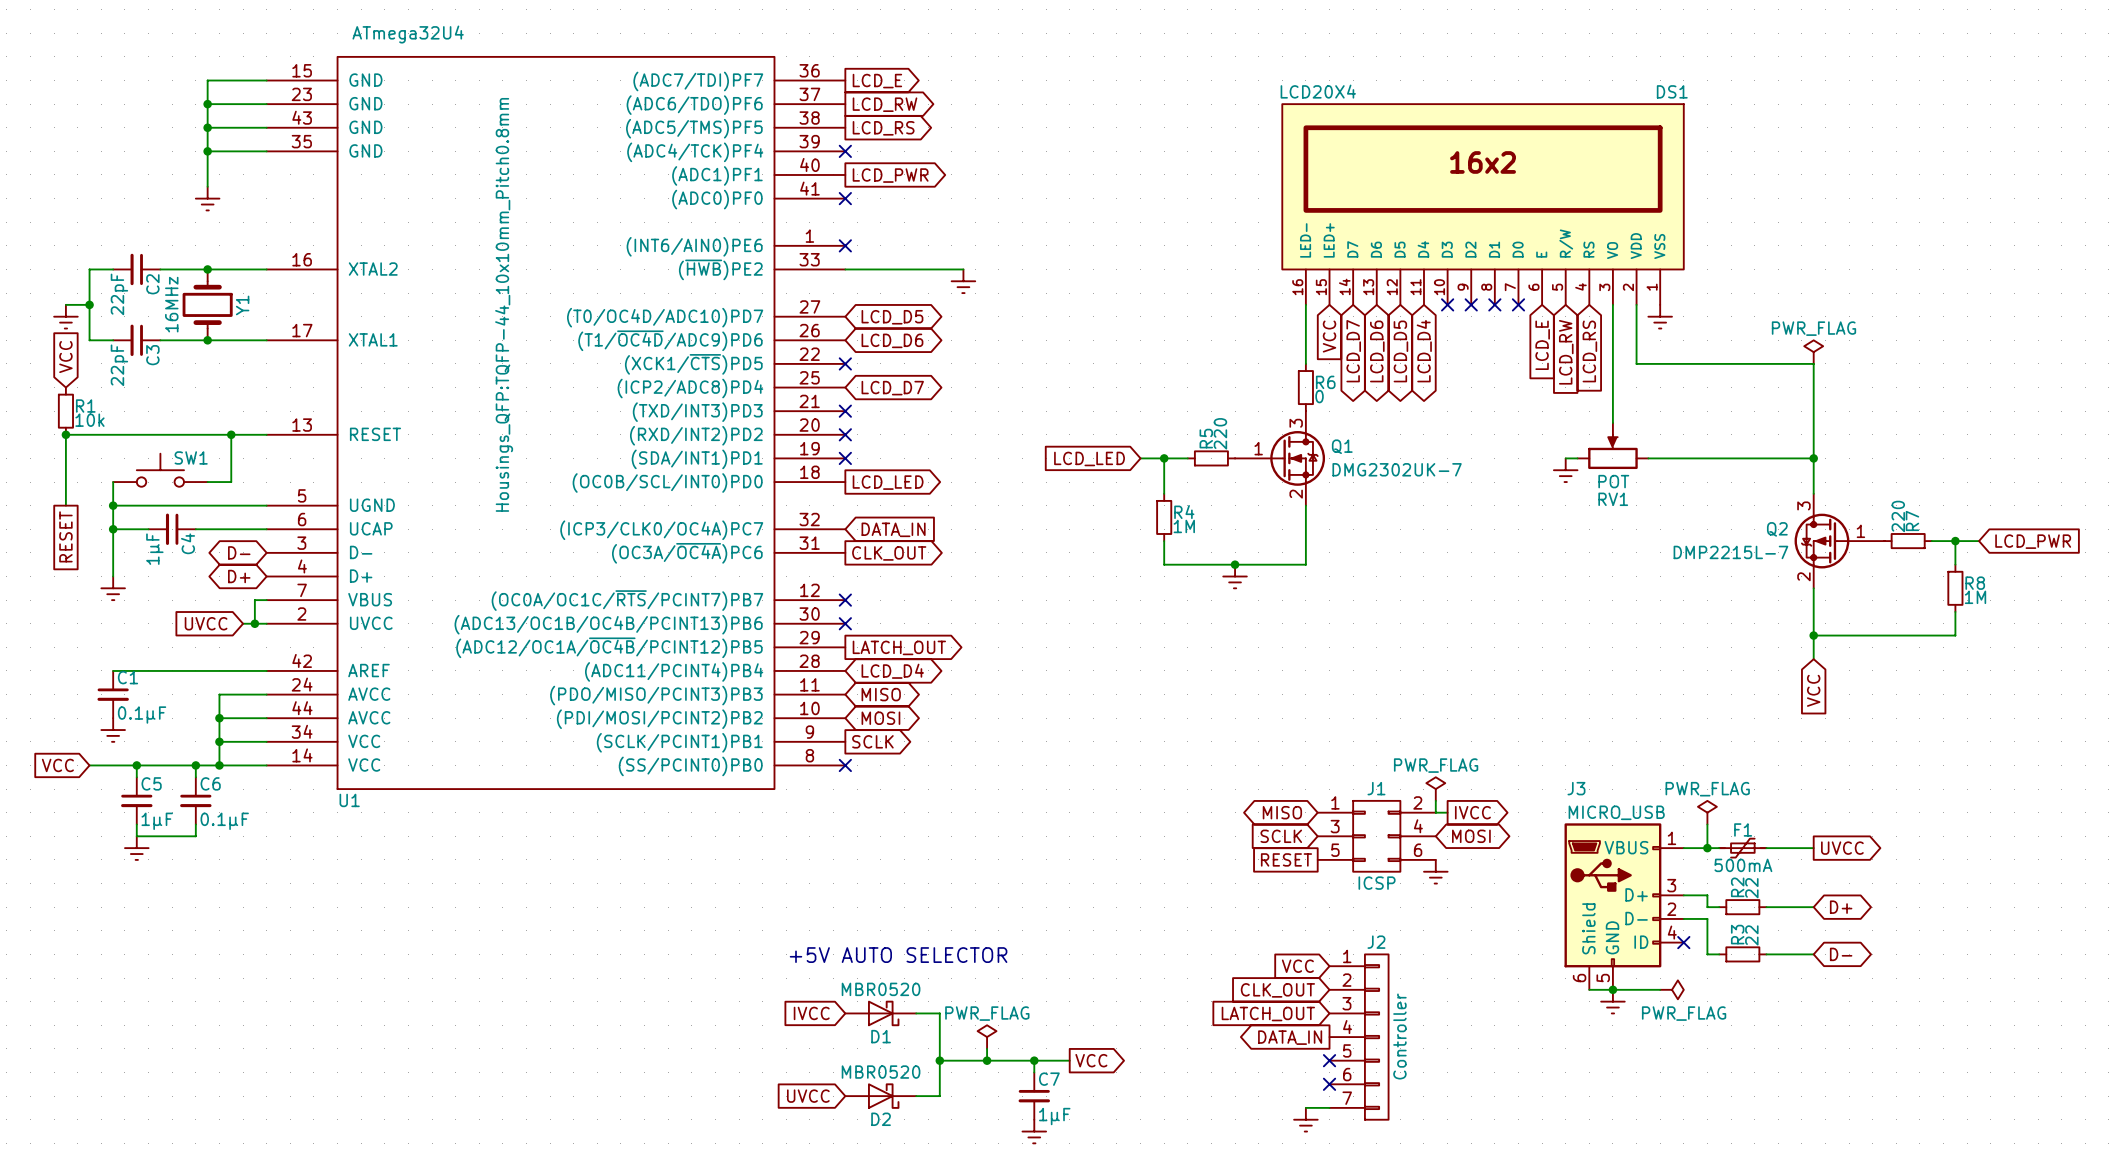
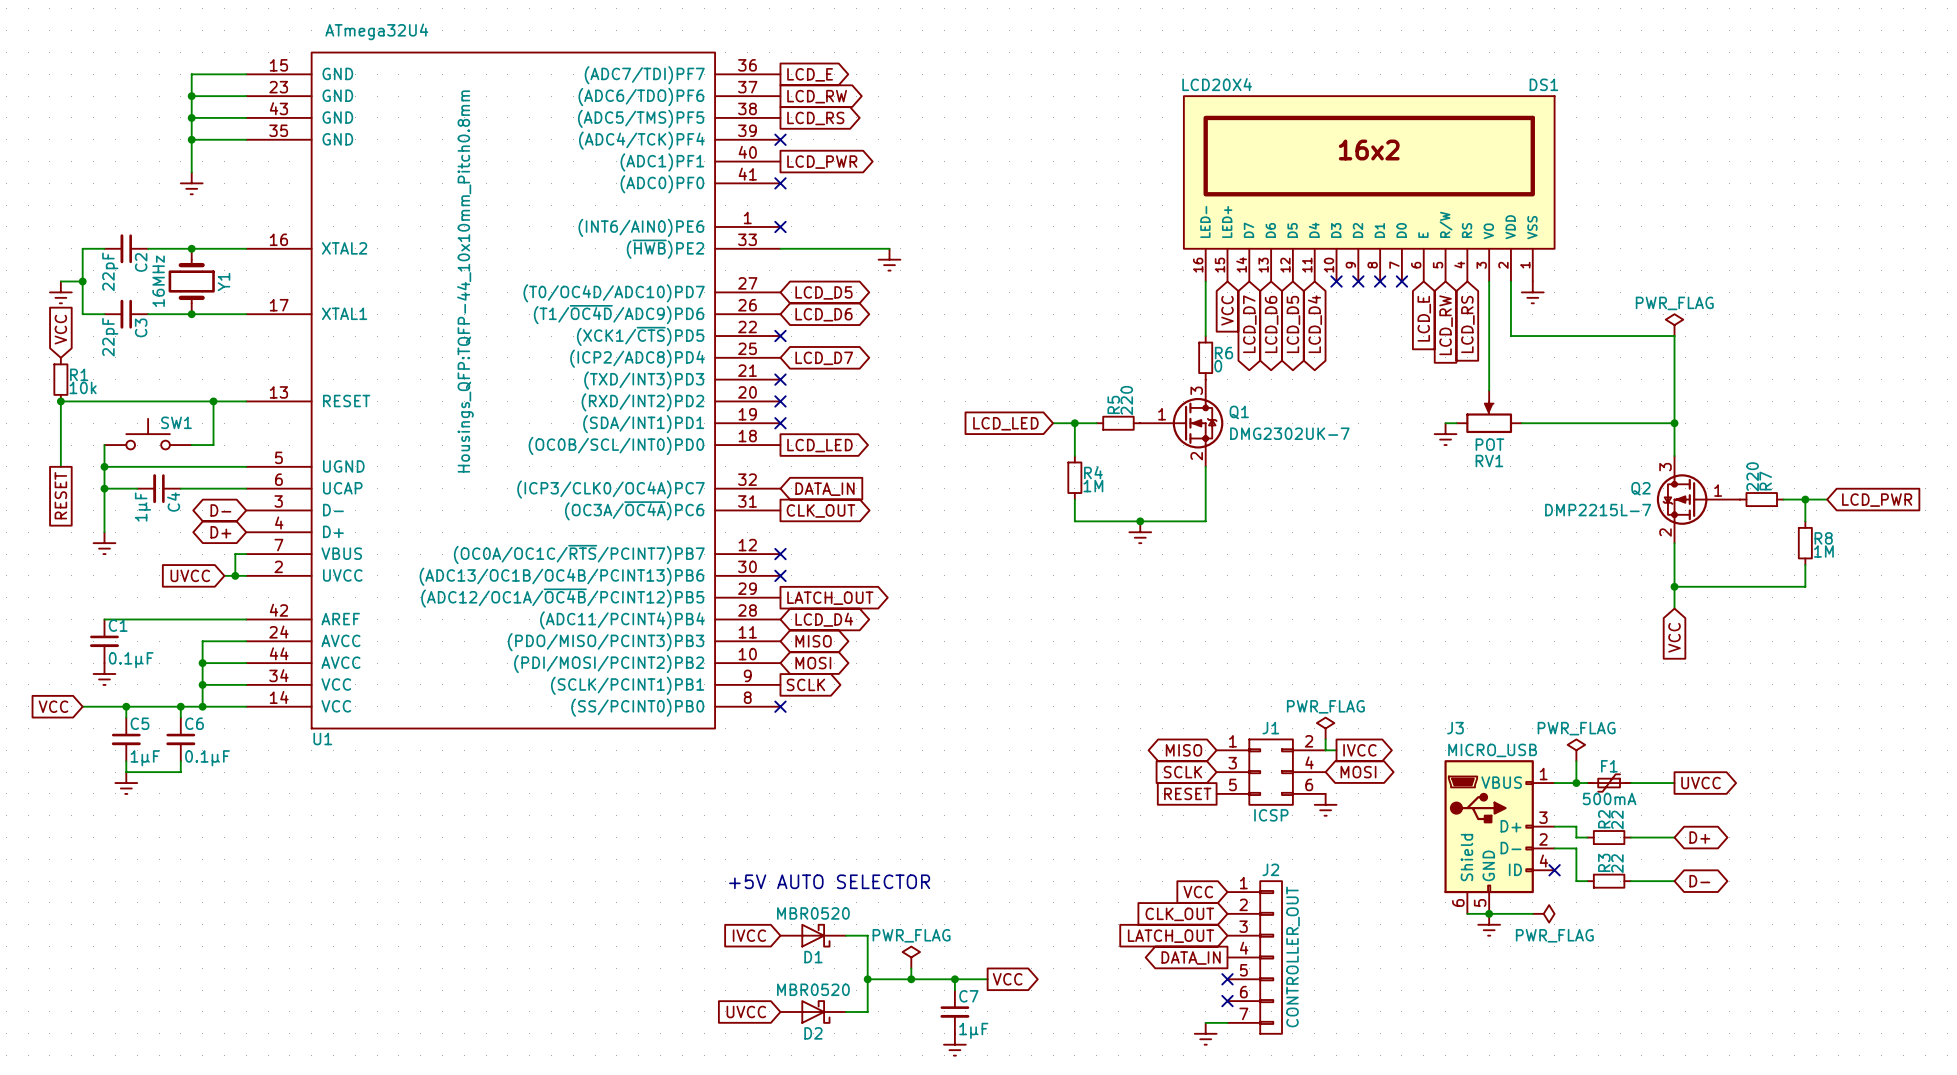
J2 value: Controller (1399, 1036) -> CONTROLLER_OUT (1293, 956)

